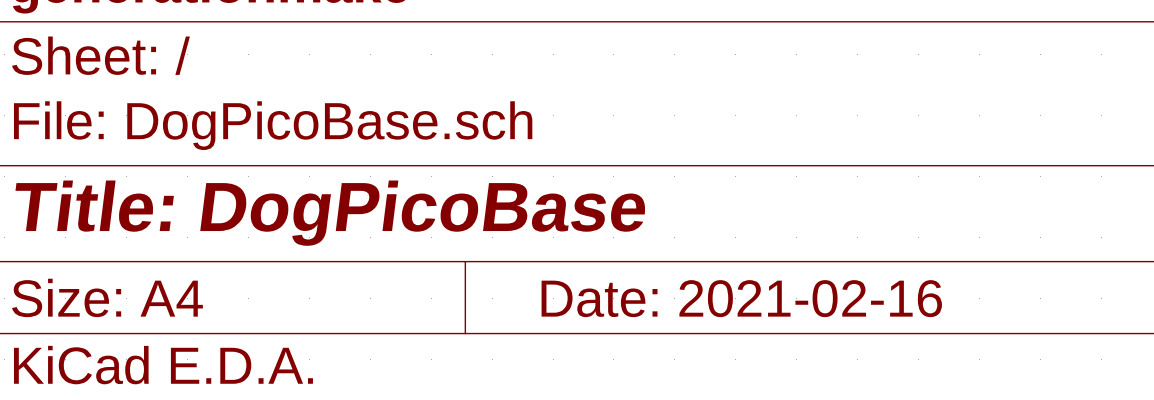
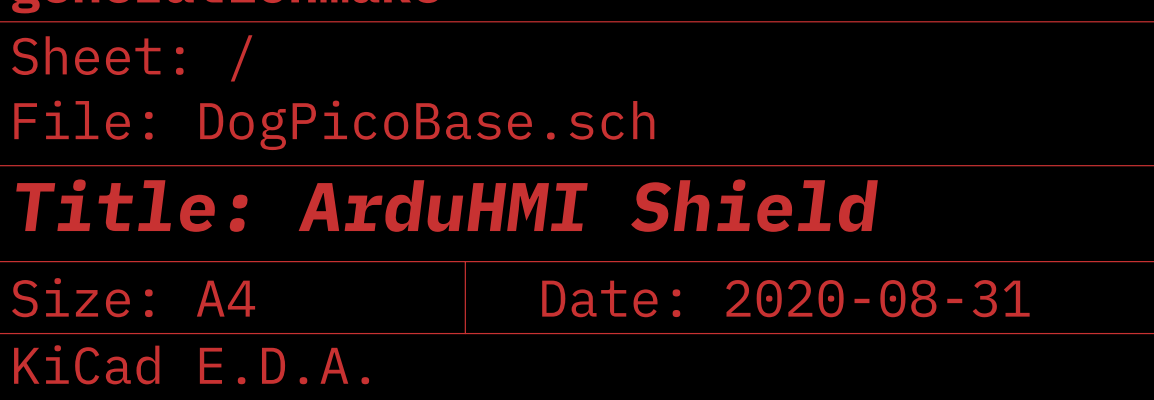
title block: Title: DogPicoBase (330, 213) -> Title: ArduHMI Shield (447, 205)
title block: Date: 2021-02-16 (741, 298) -> Date: 2020-08-31 (785, 298)

